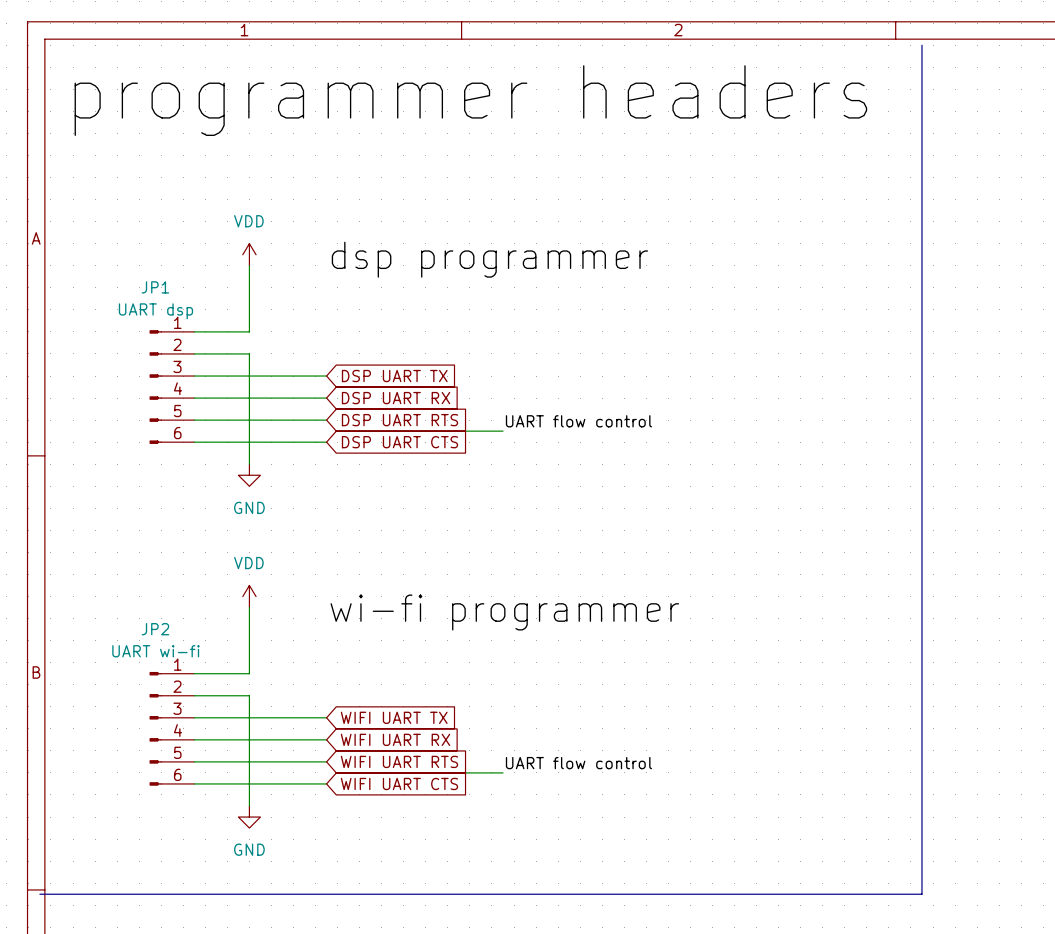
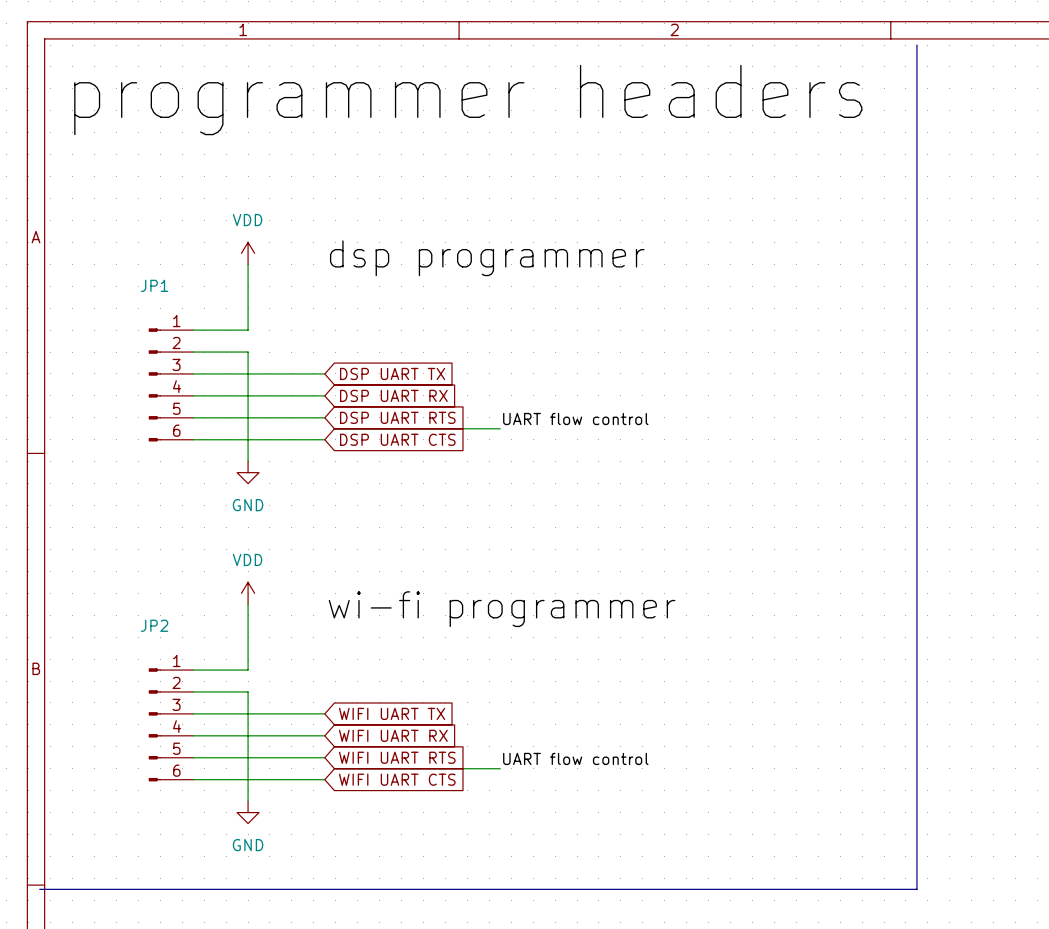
JP1 value: UART dsp (155, 311) -> none
JP2 value: UART wi-fi (155, 651) -> none

